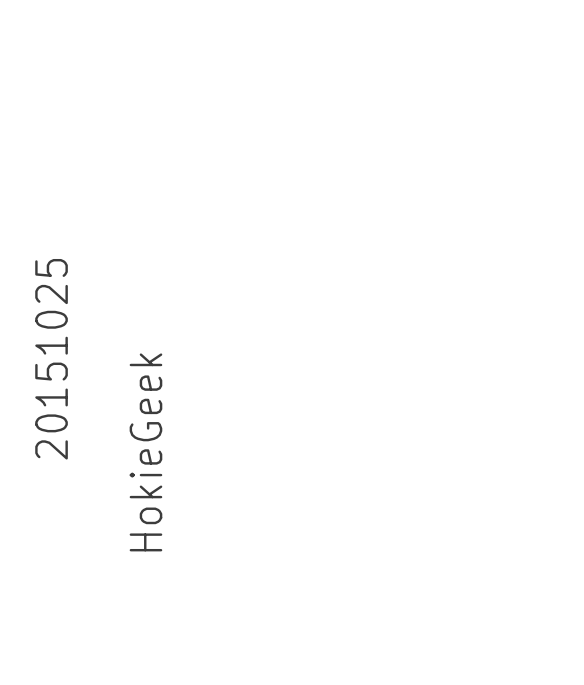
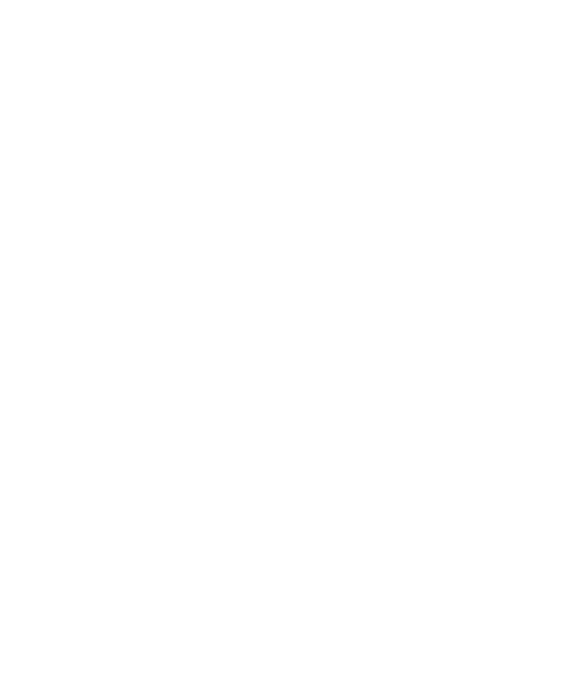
text: 20151025 (51, 359) -> none
text: HokieGeek (145, 452) -> none

